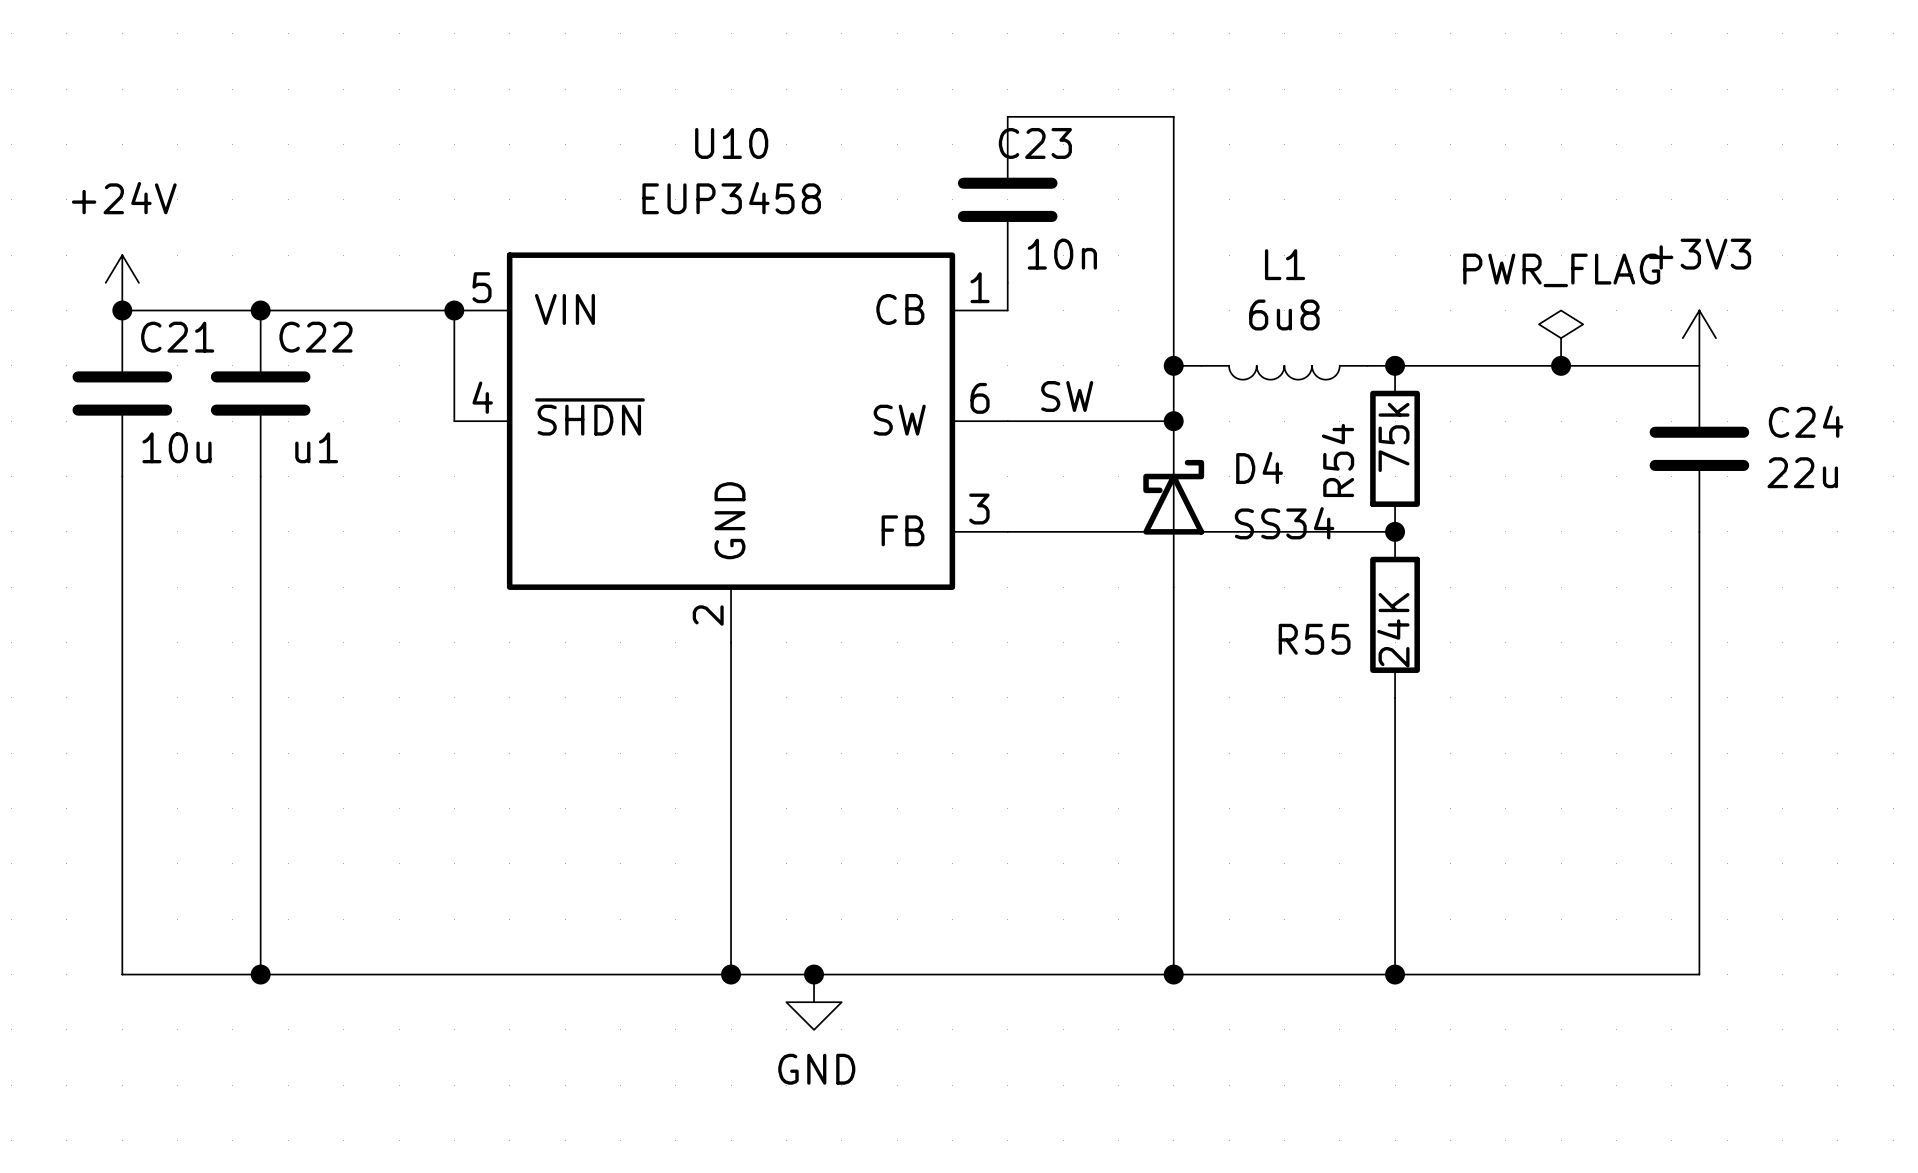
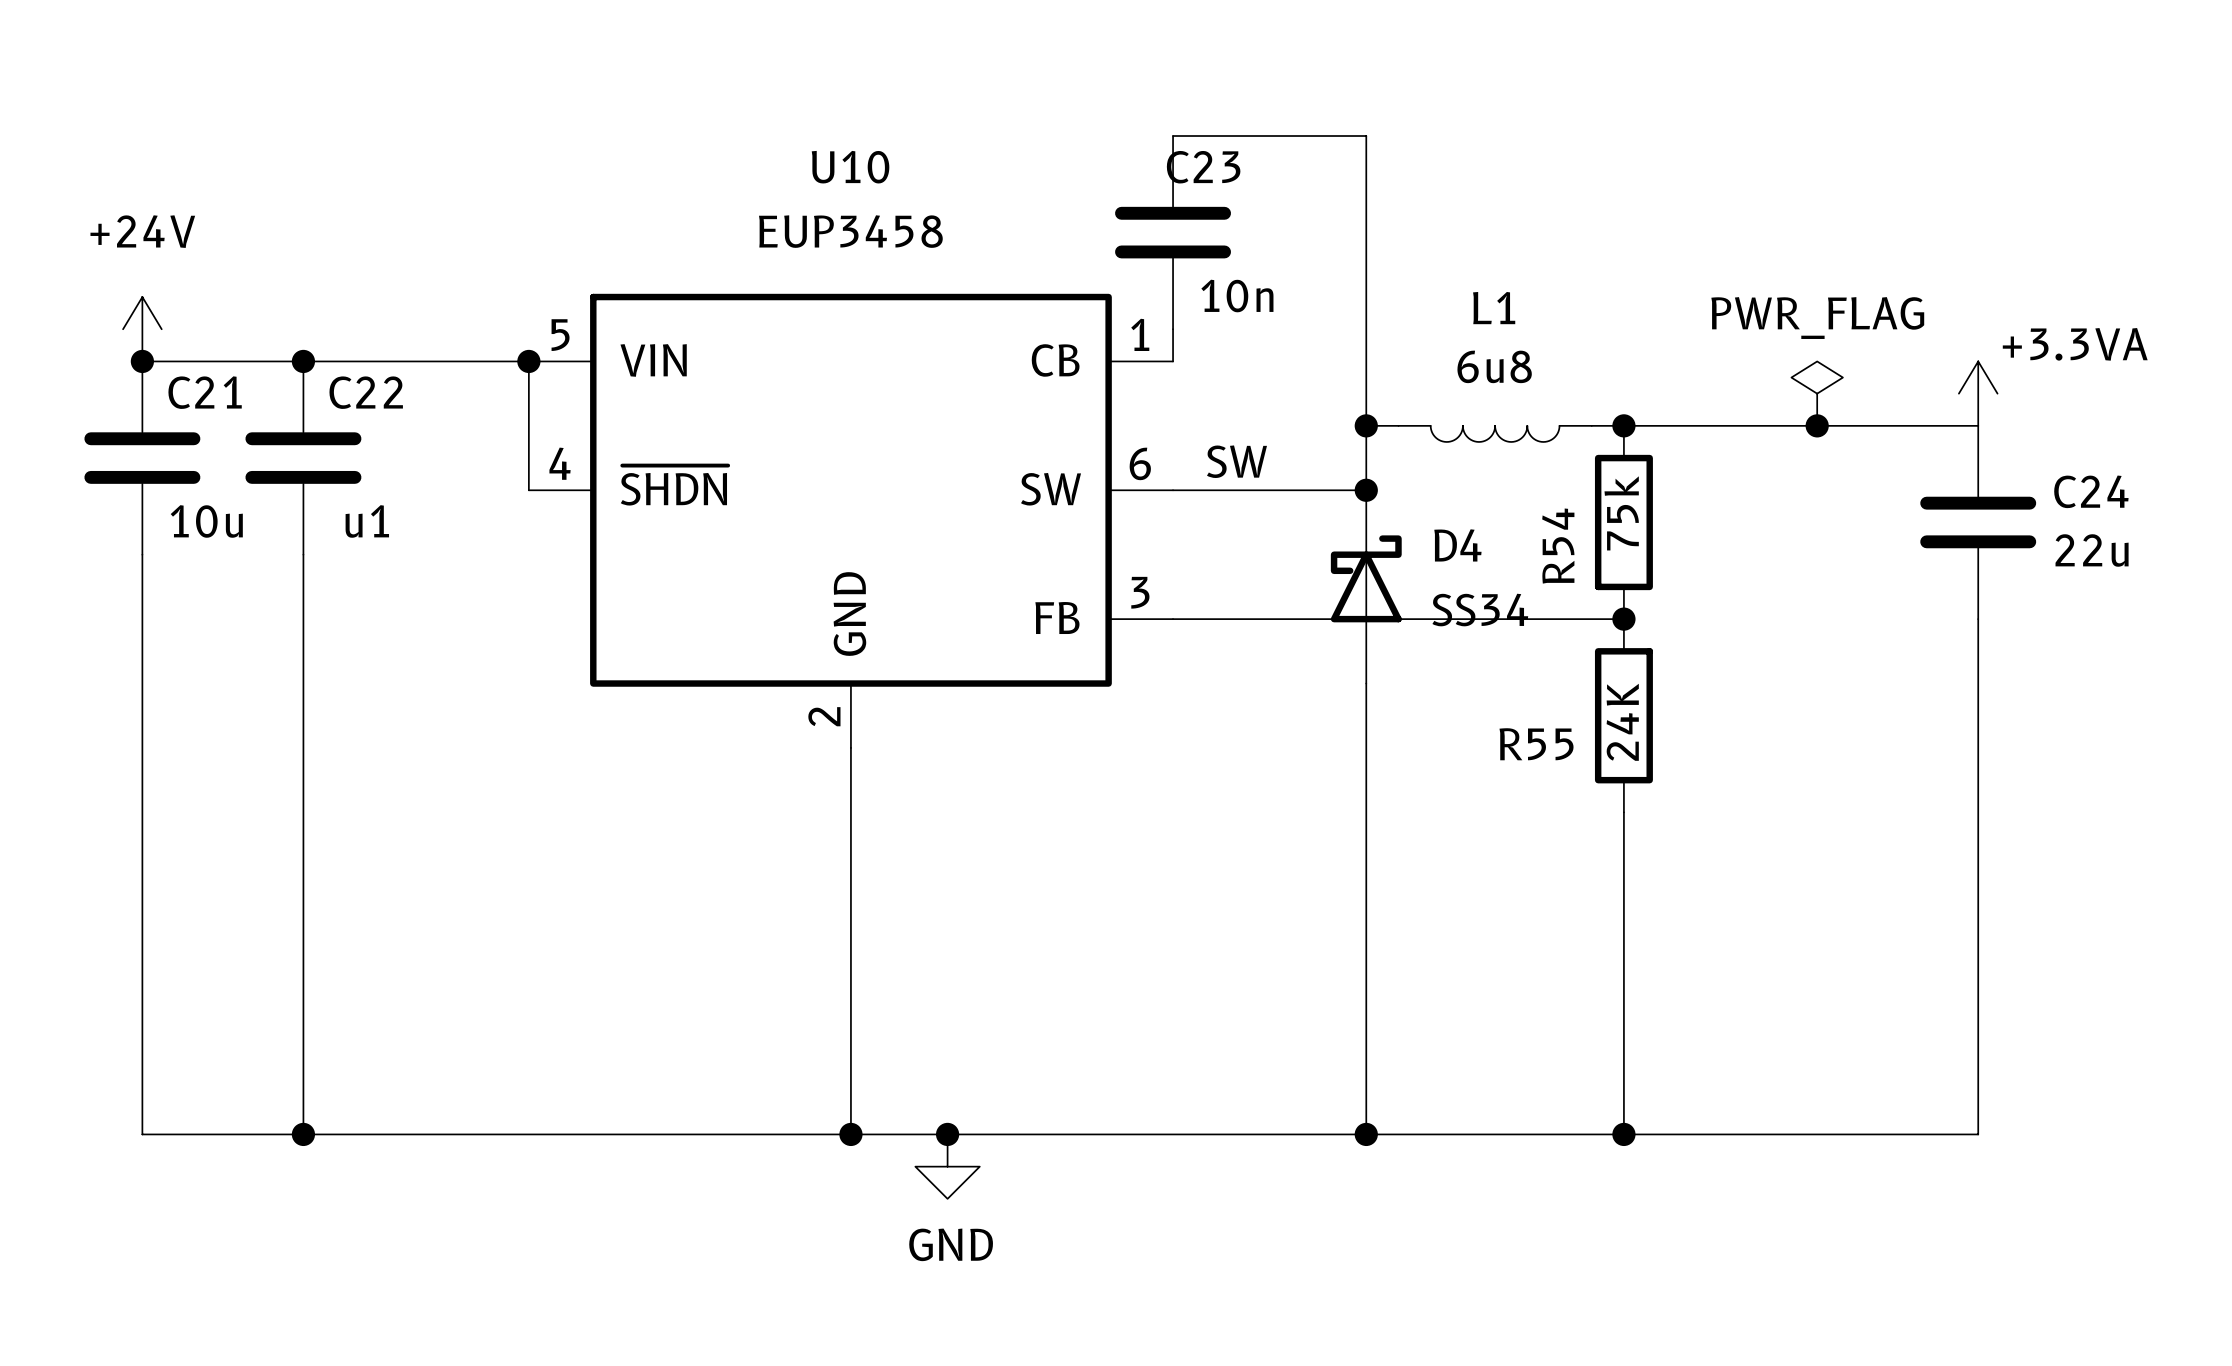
power symbol: +3V3 (1699, 338) -> +3.3VA (1978, 393)

